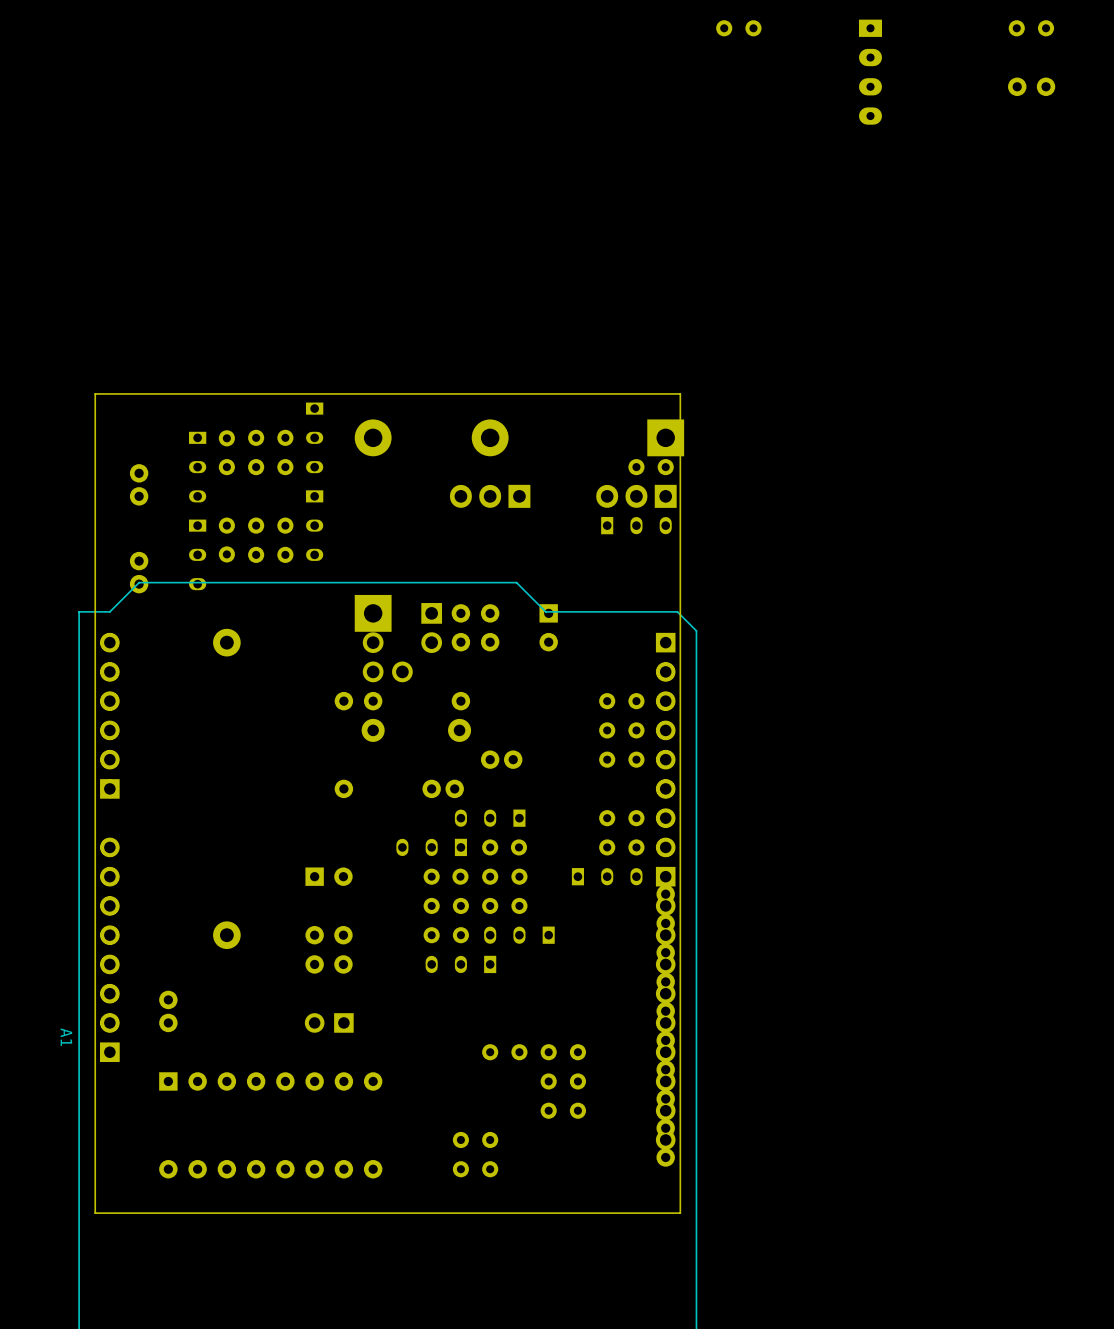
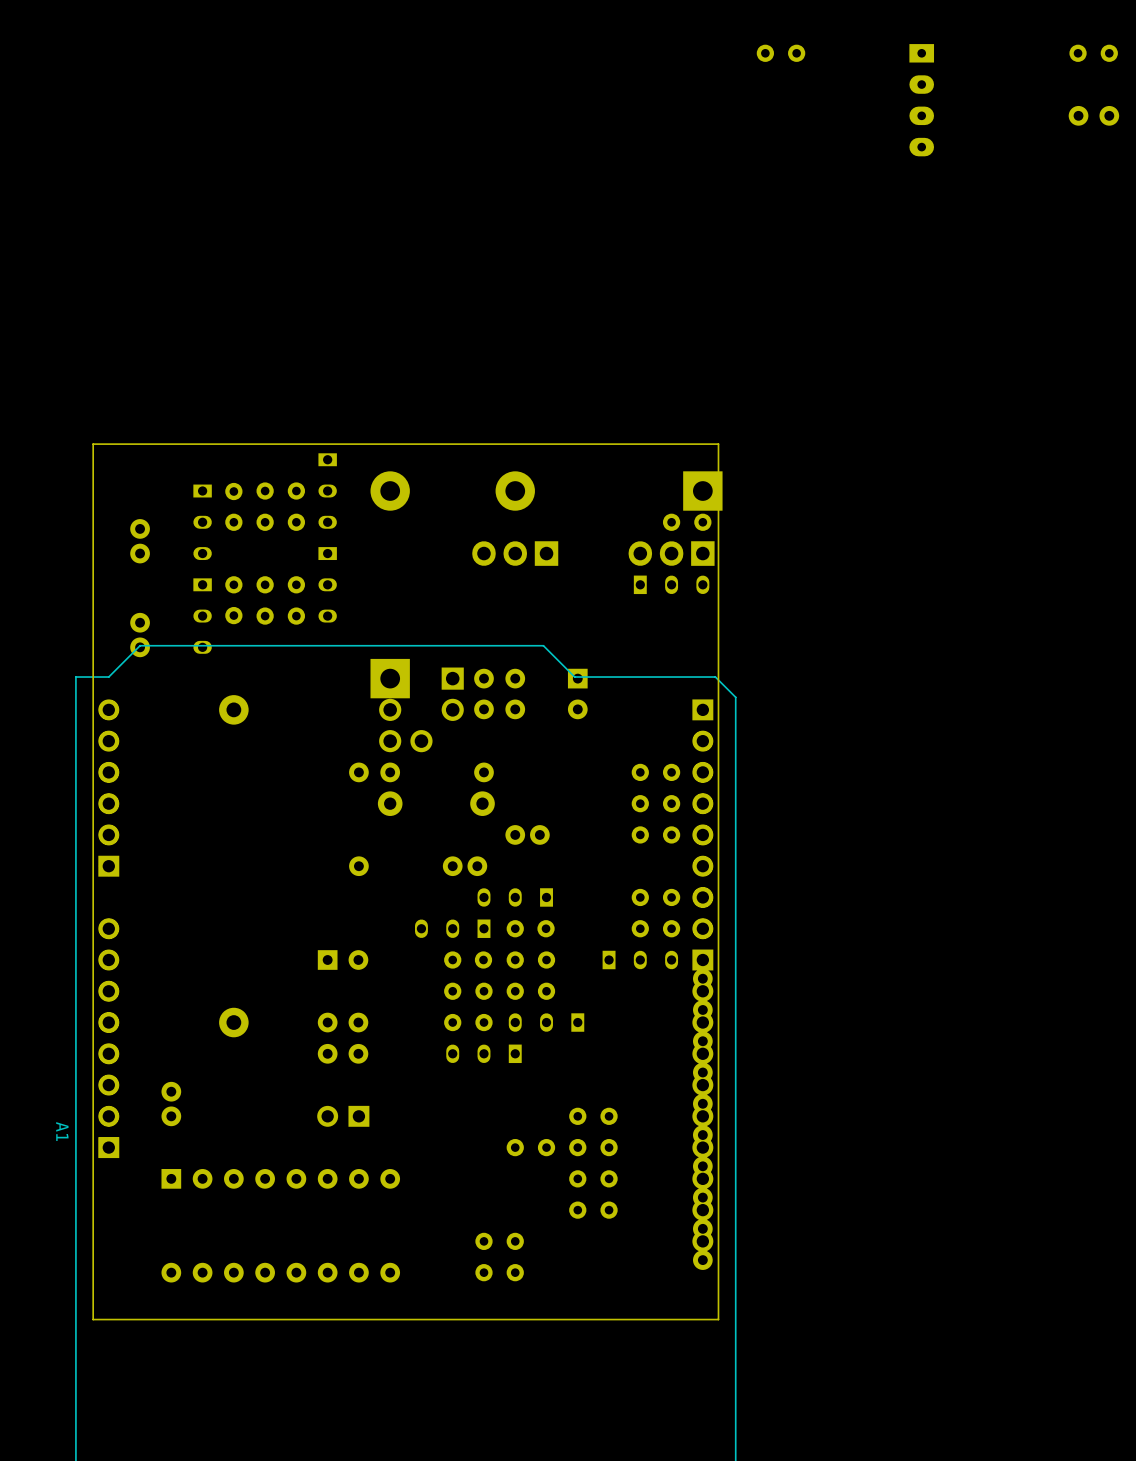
part: none -> (593, 1116)

